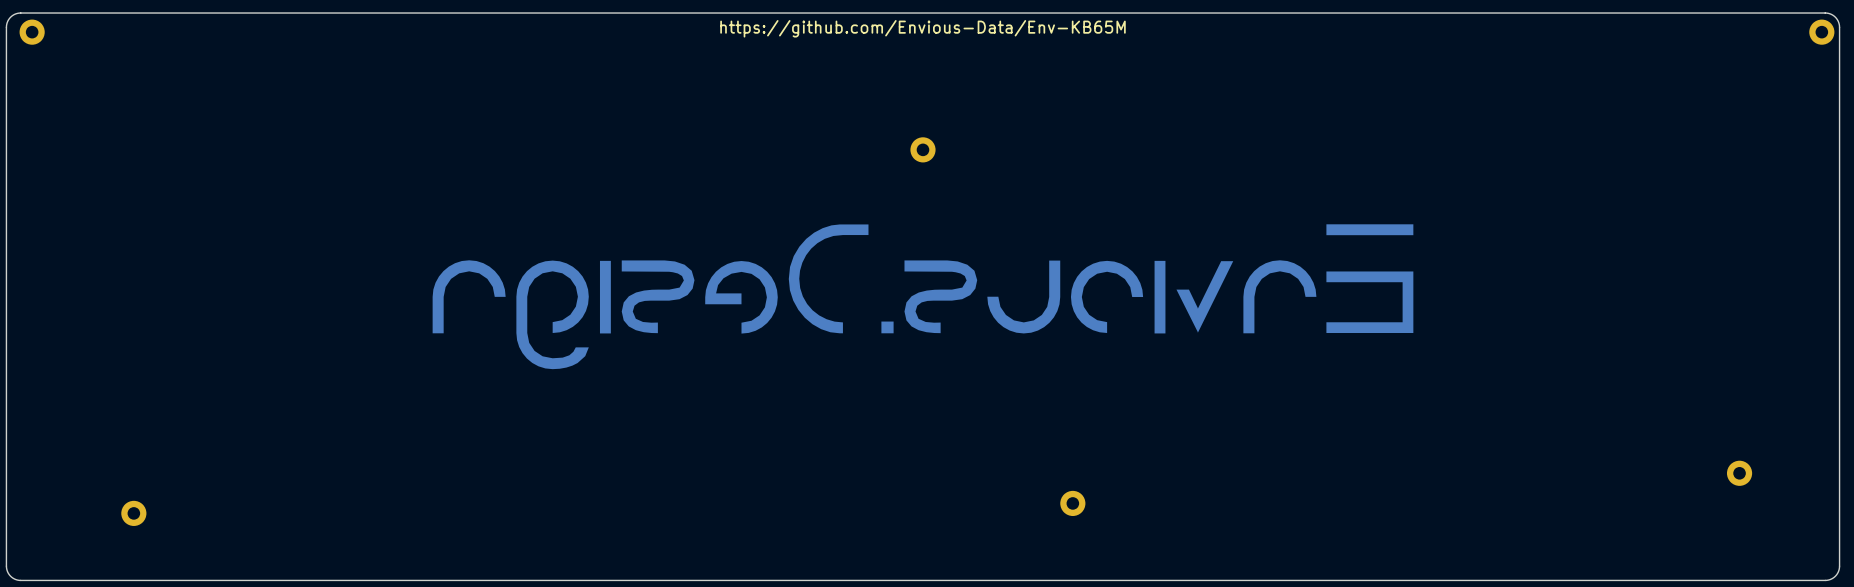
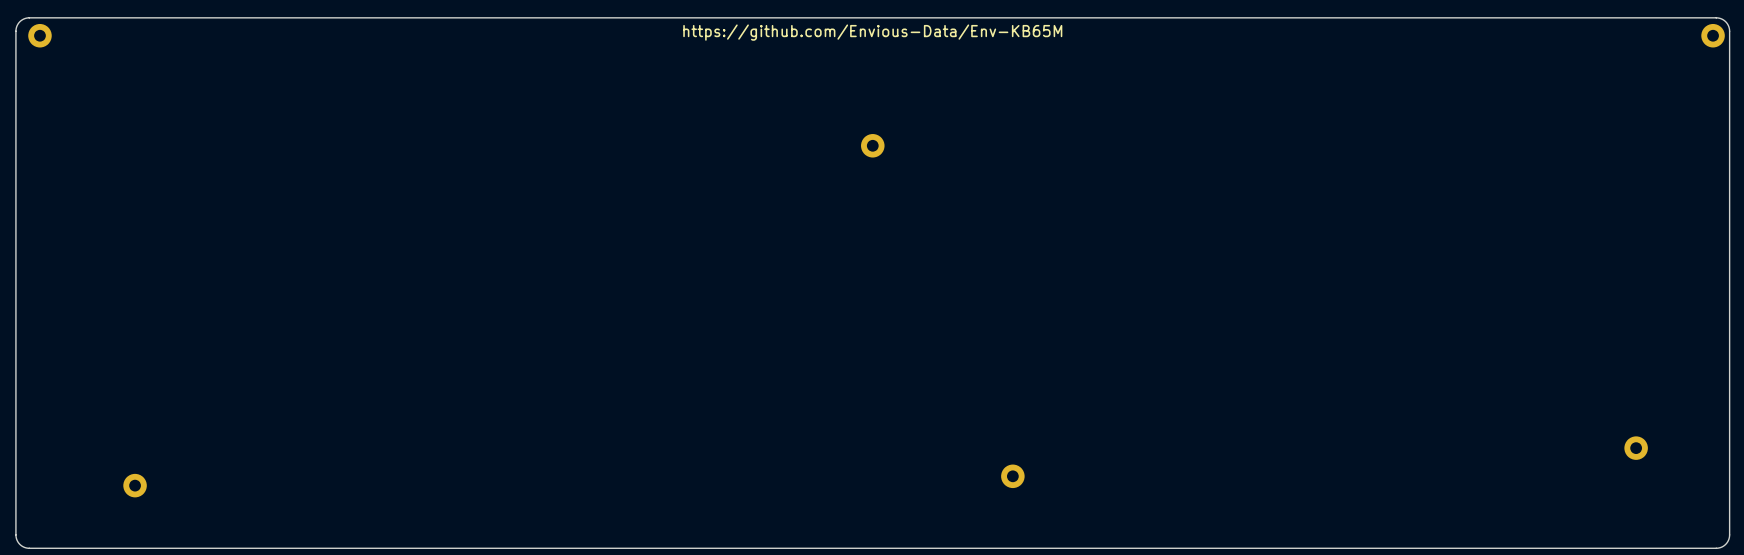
drawing: [432, 224, 1414, 370] -> none

